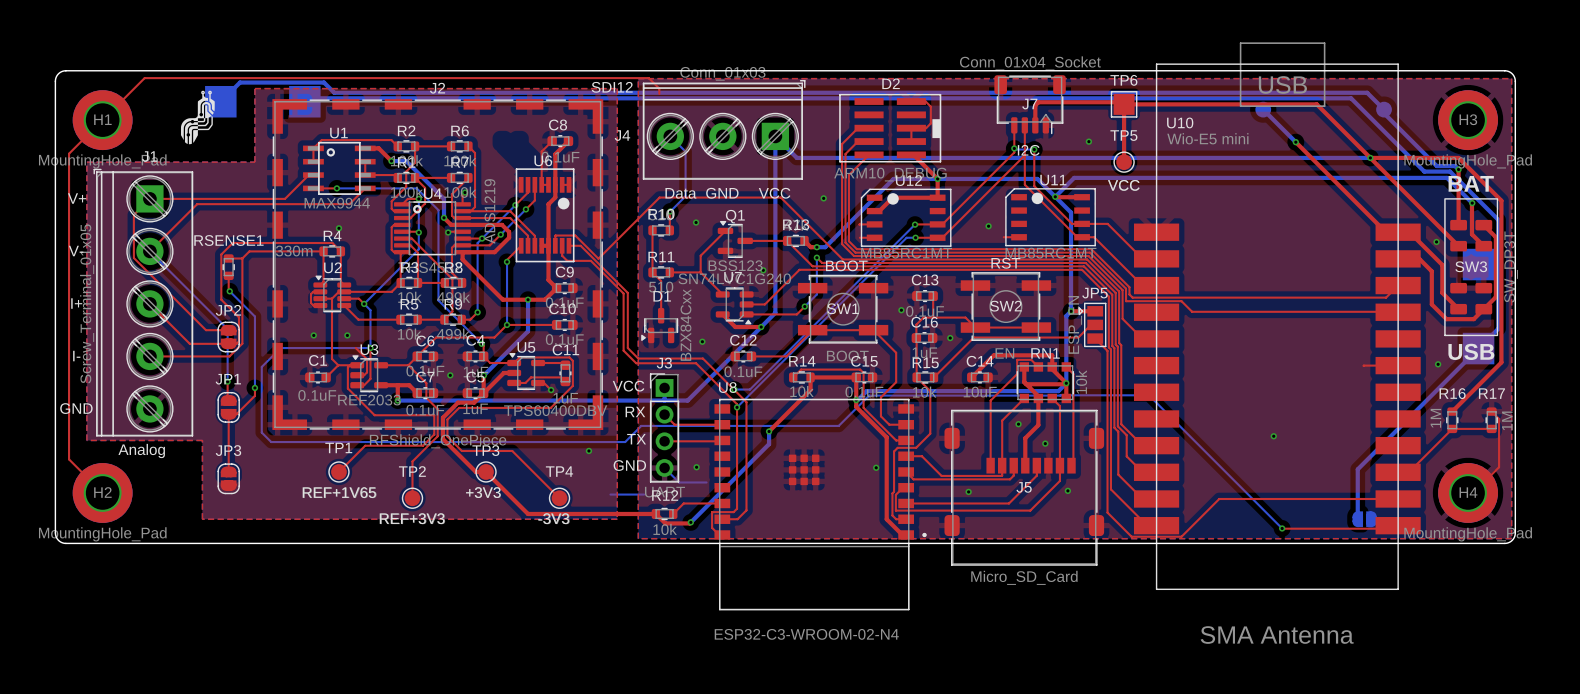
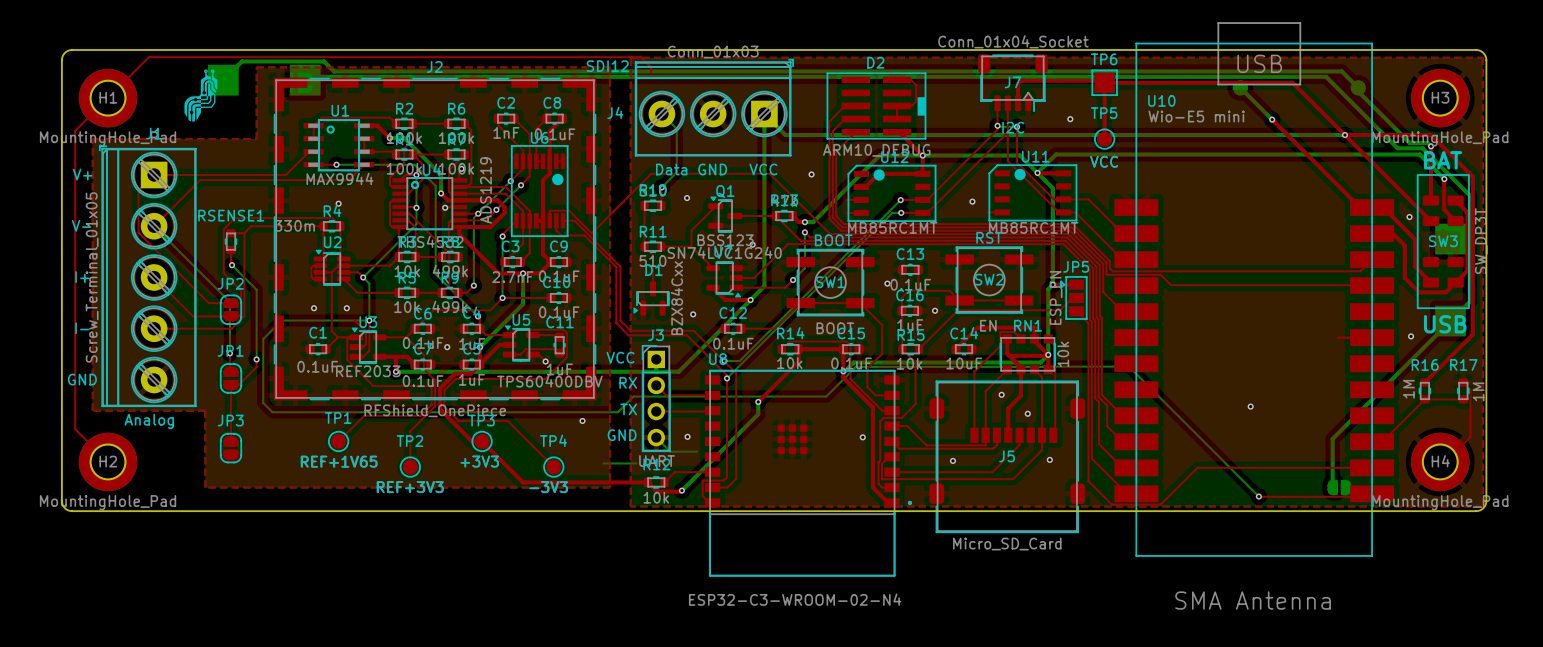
top track: none -> (498, 118) (498, 125) (523, 150) (523, 161)
C2: none -> 1nF (506, 118)
top track: none -> (514, 118) (529, 134) (529, 161)
top track: none -> (523, 220) (523, 243) (504, 262)
top track: none -> (529, 220) (529, 253) (520, 262)
C3: none -> 2.7nF (512, 262)

